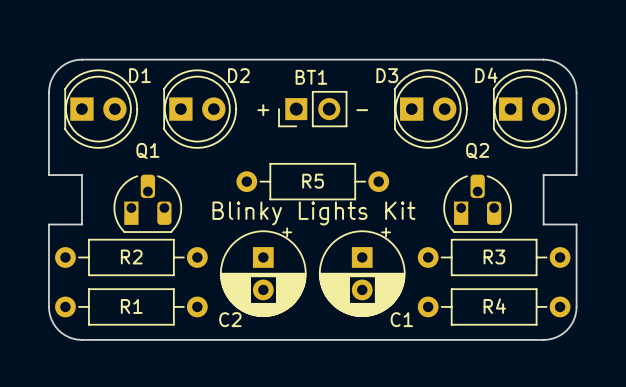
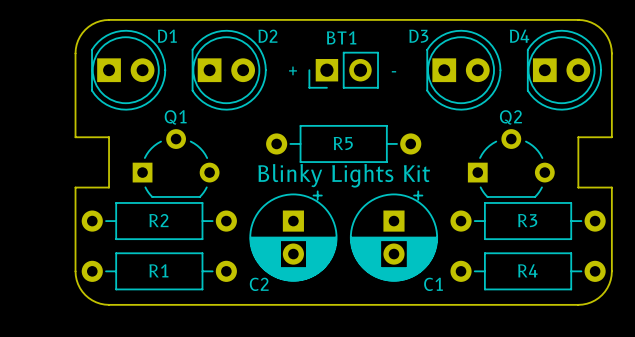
Q1 footprint: [113, 174, 183, 233] -> [132, 129, 220, 198]
Q2 footprint: [443, 174, 512, 233] -> [467, 129, 555, 198]

